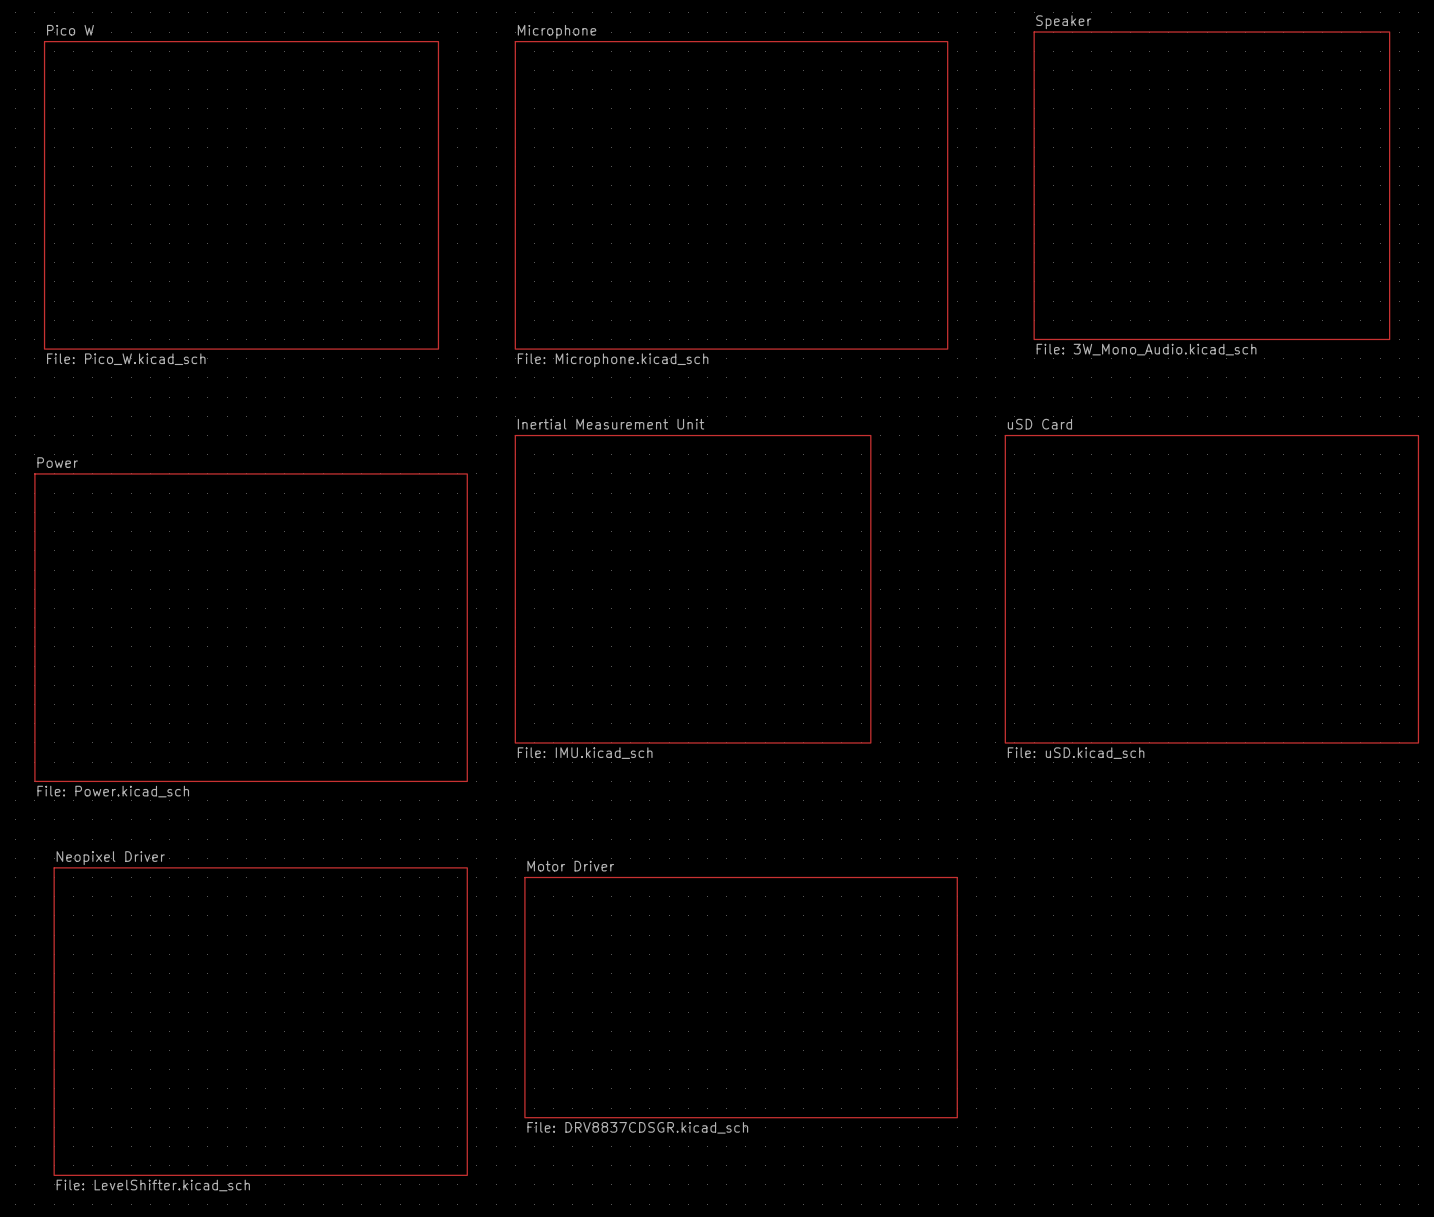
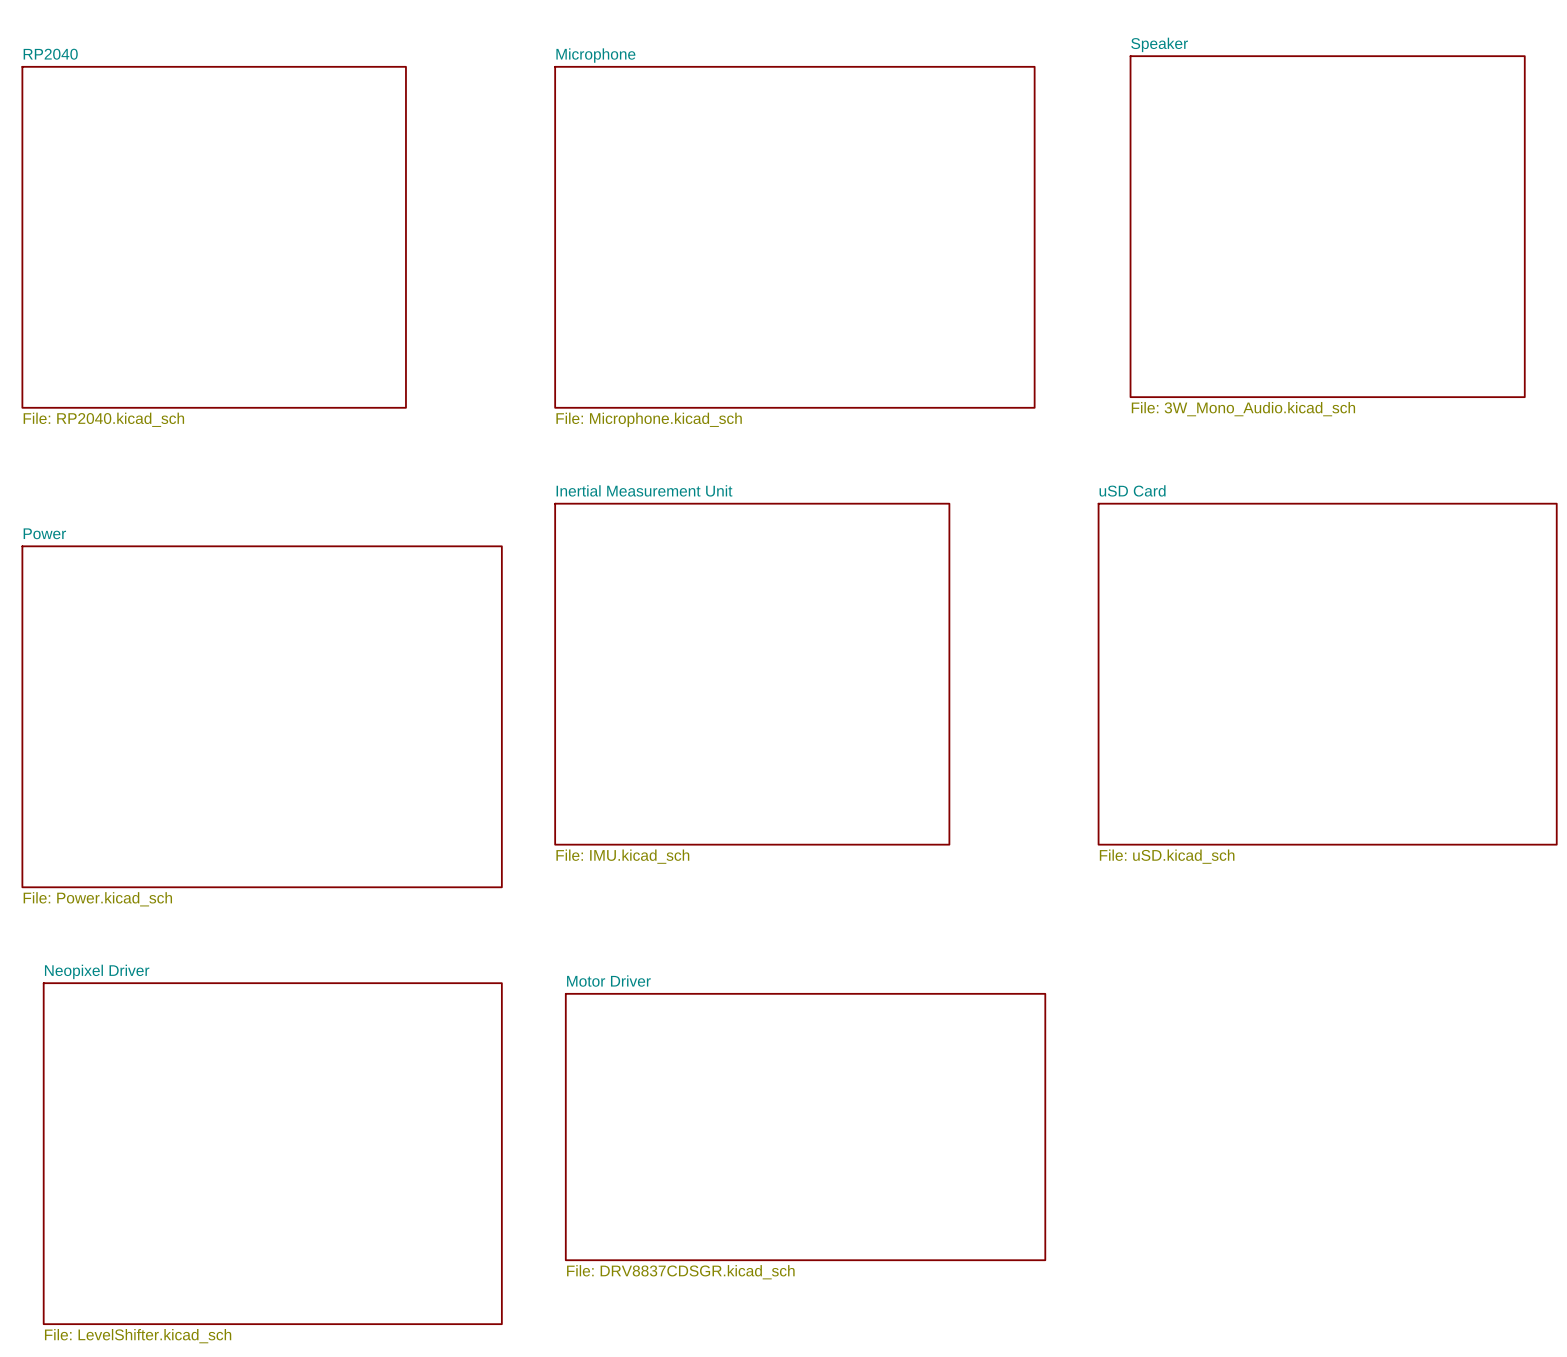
sheet RP2040: none -> File: RP2040.kicad_sch (214, 237)
sheet Pico W: File: Pico_W.kicad_sch (241, 195) -> none

